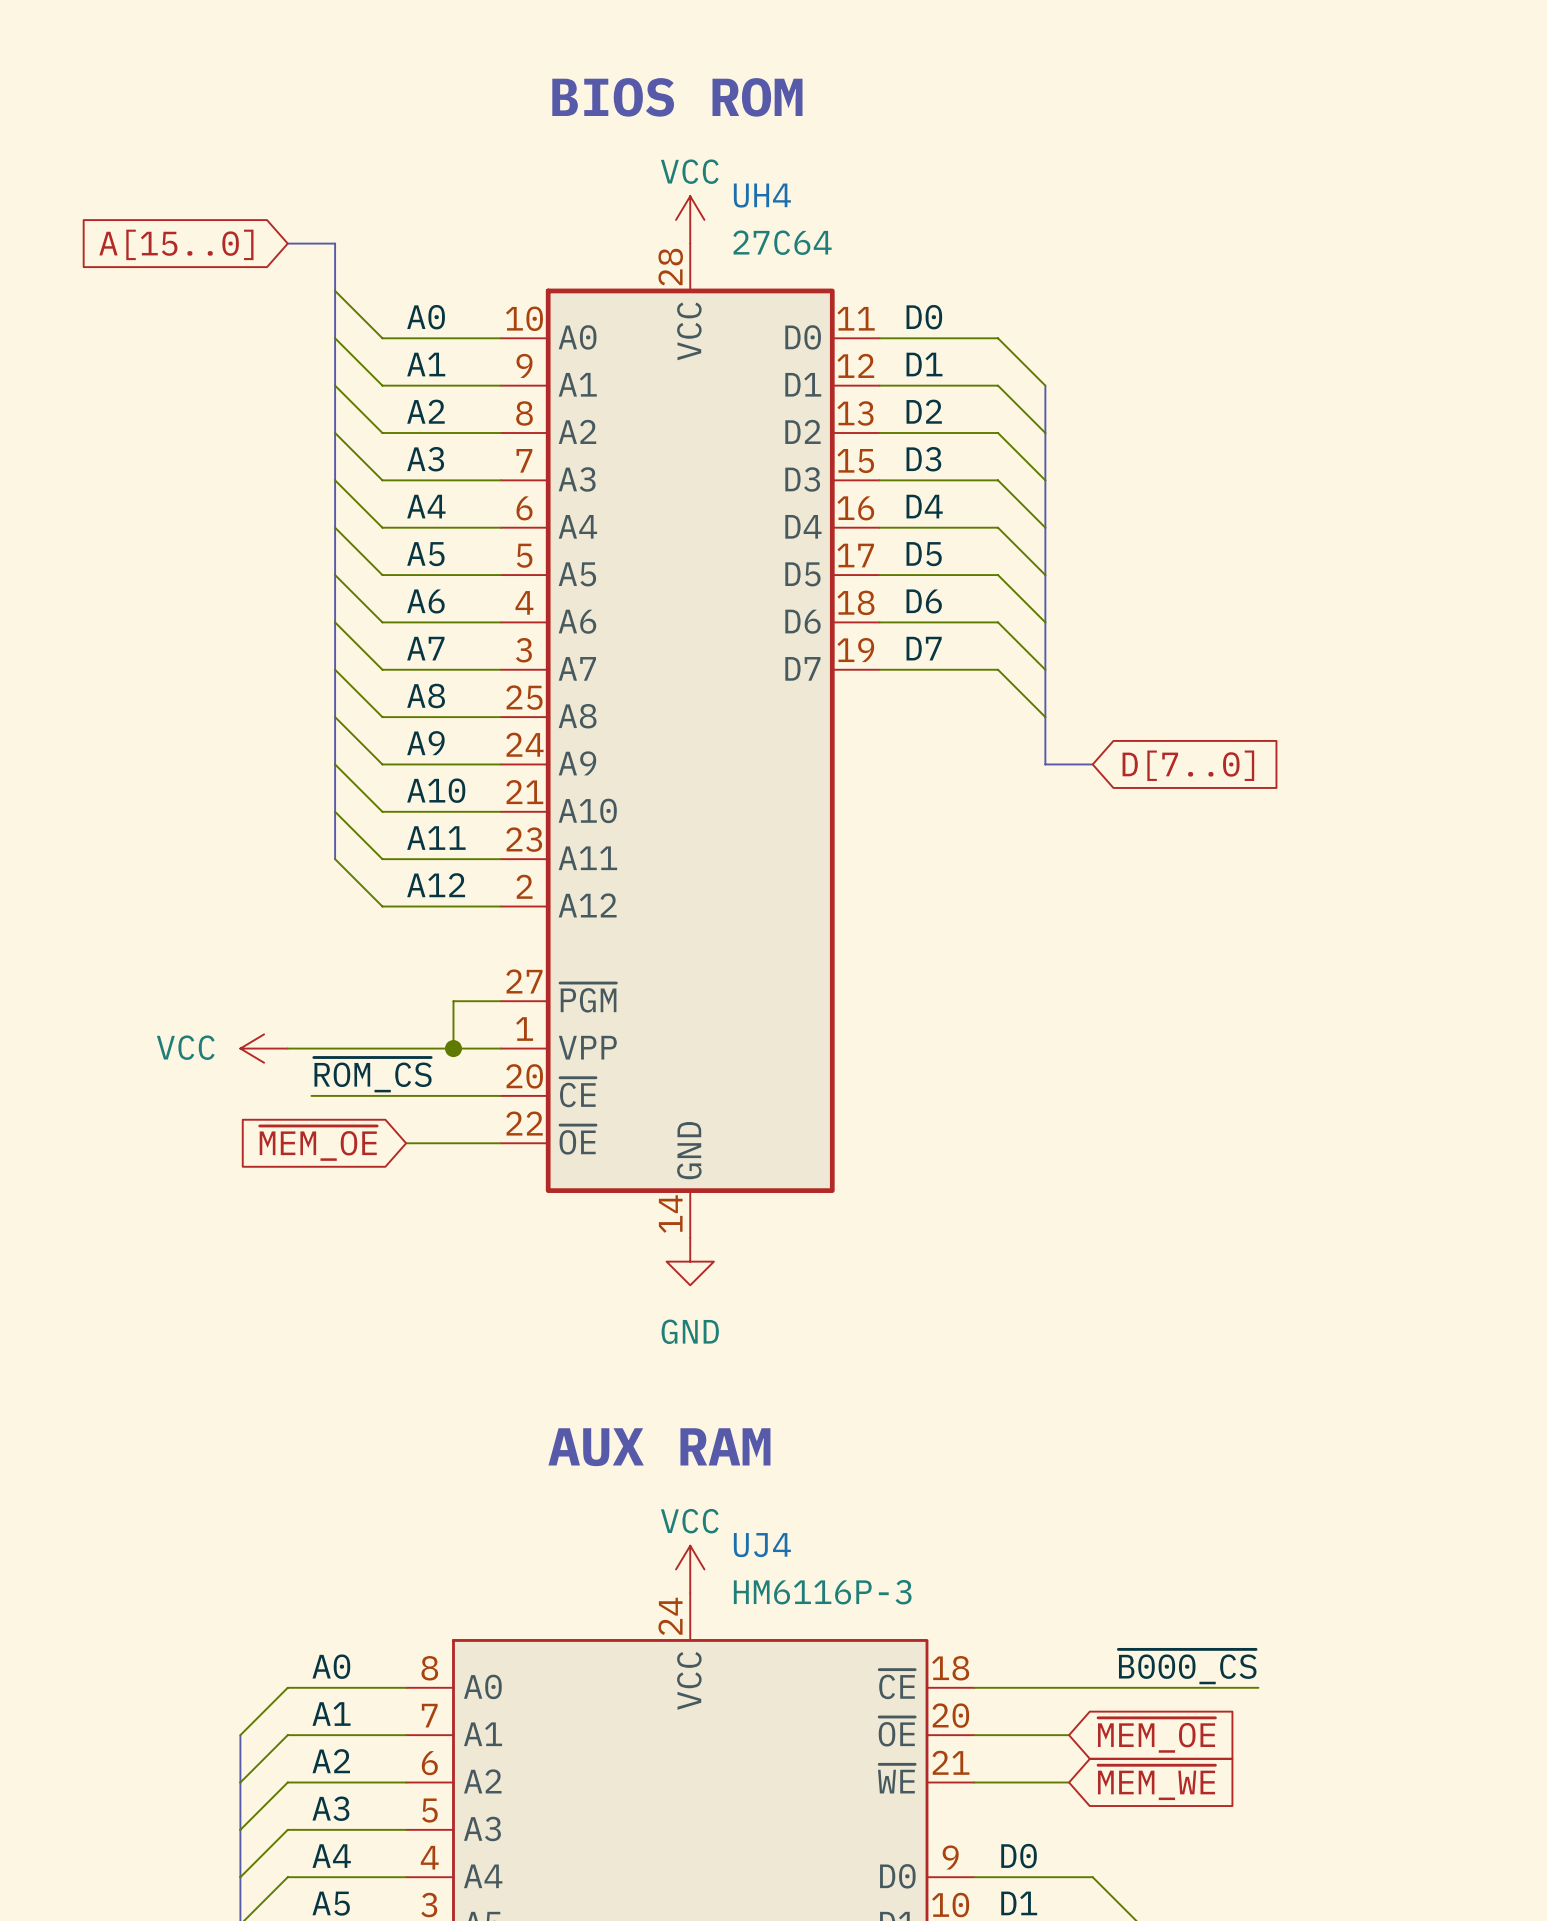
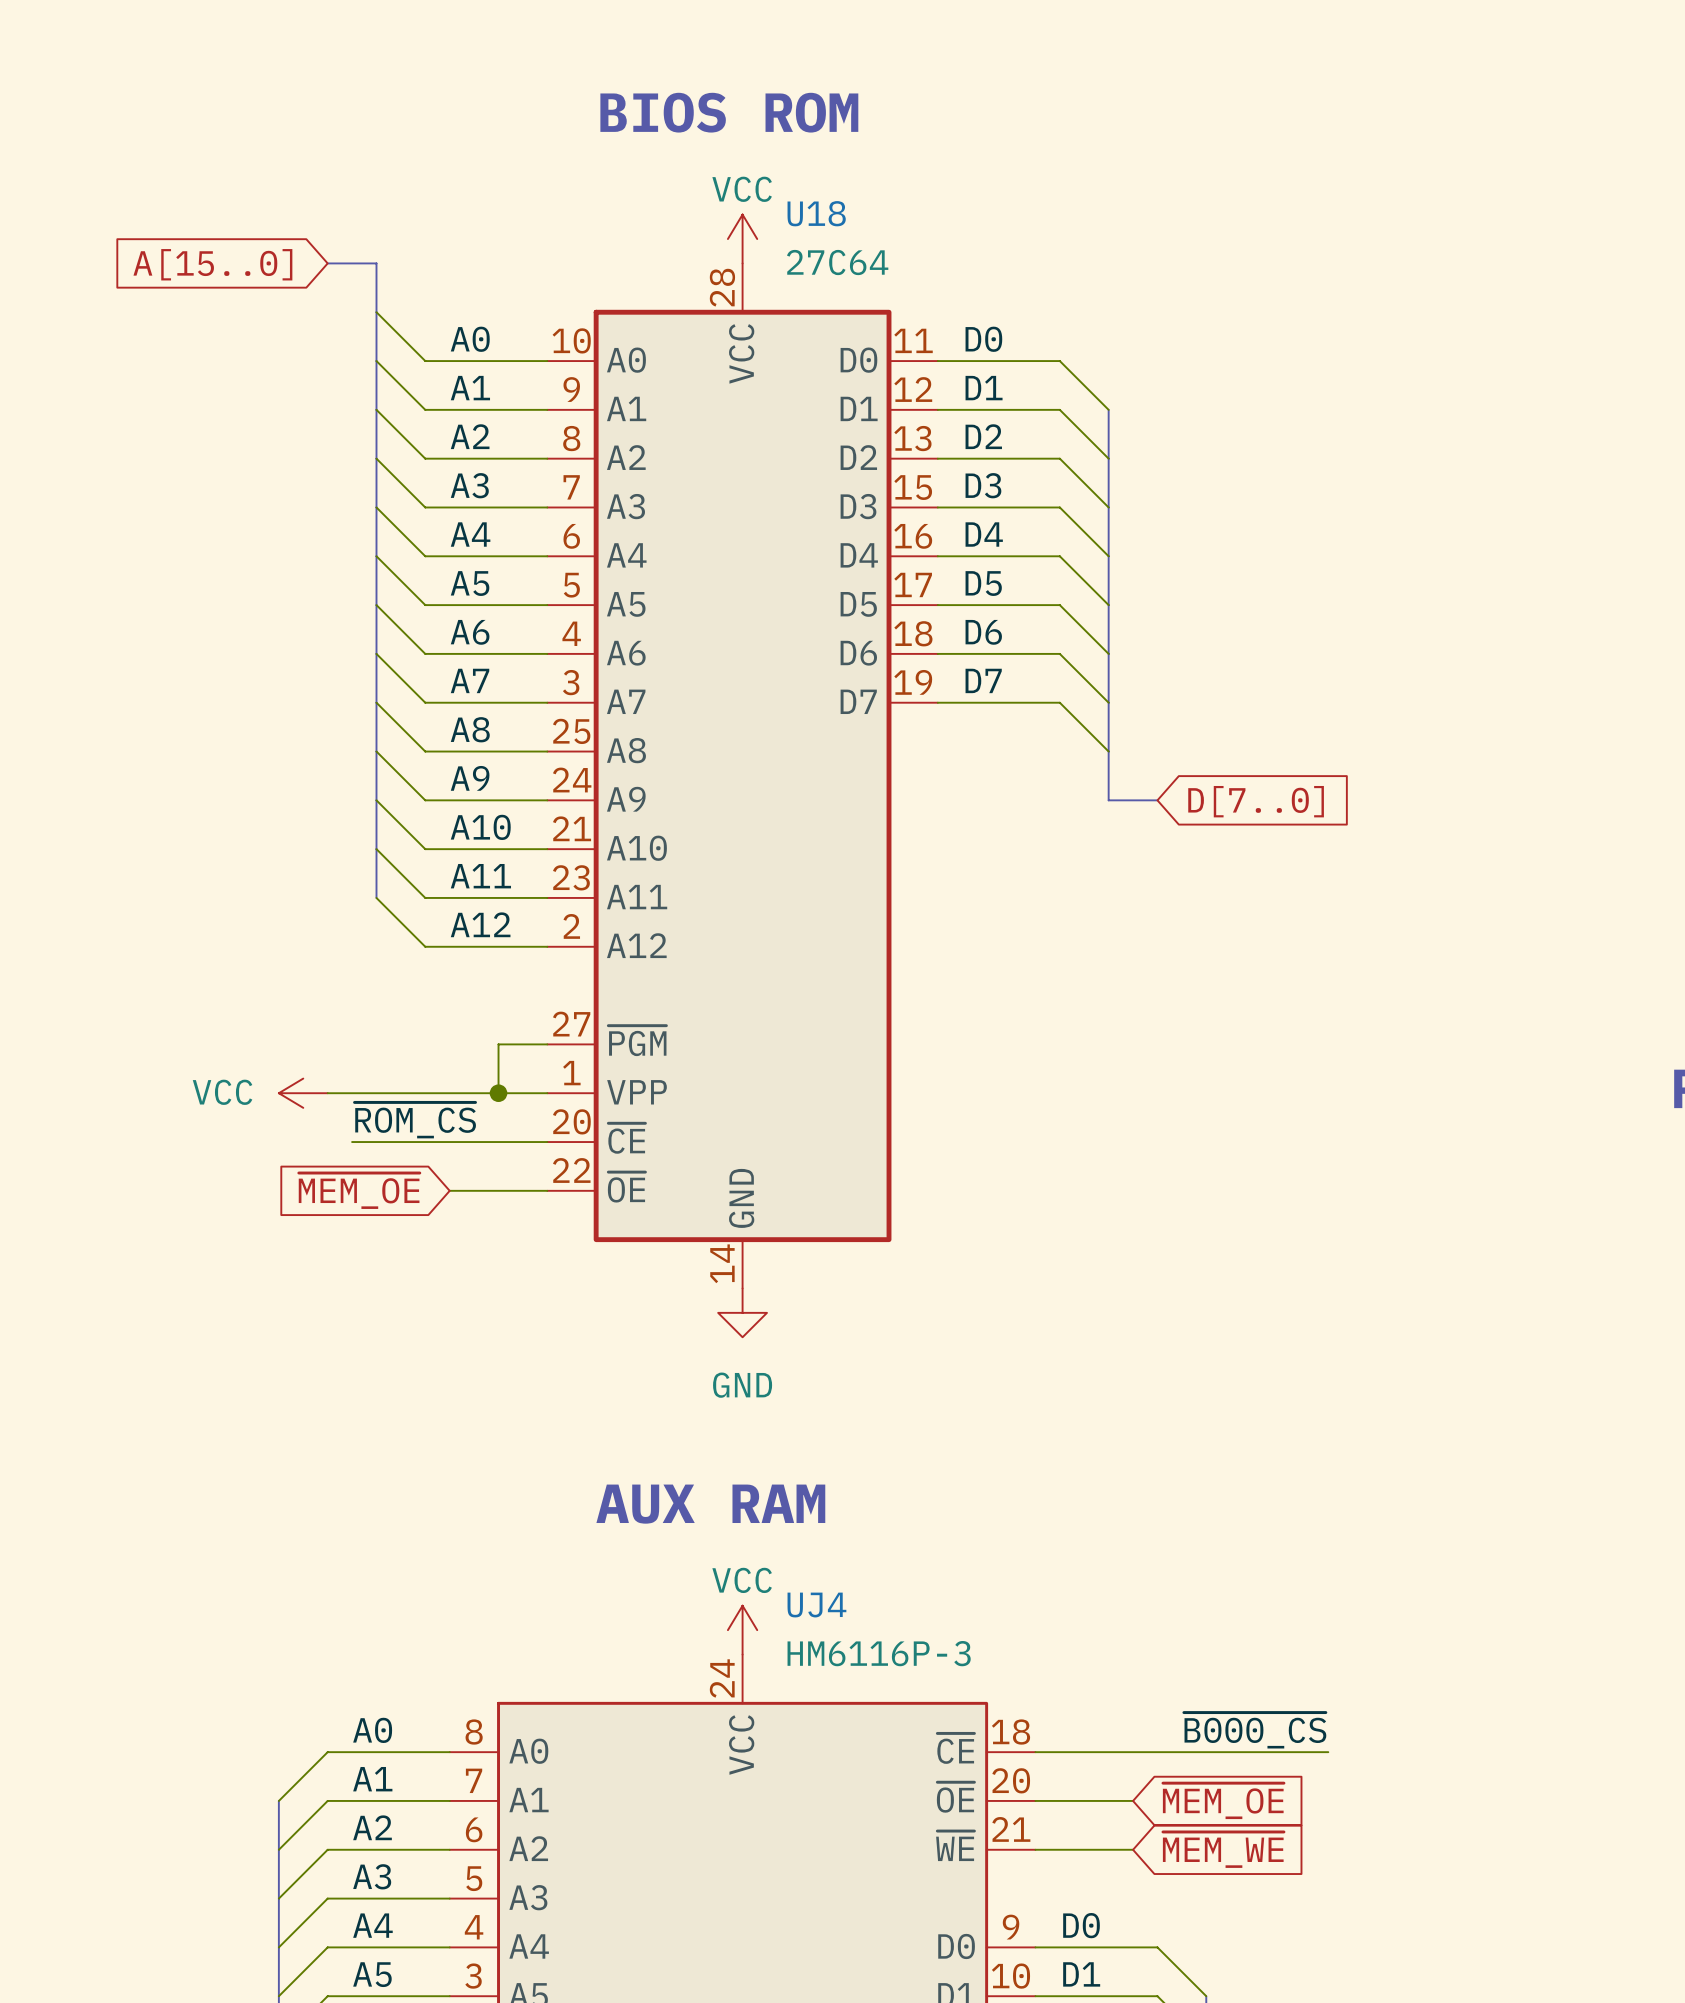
UH4 name: UH4 (762, 195) -> U18 (816, 213)

